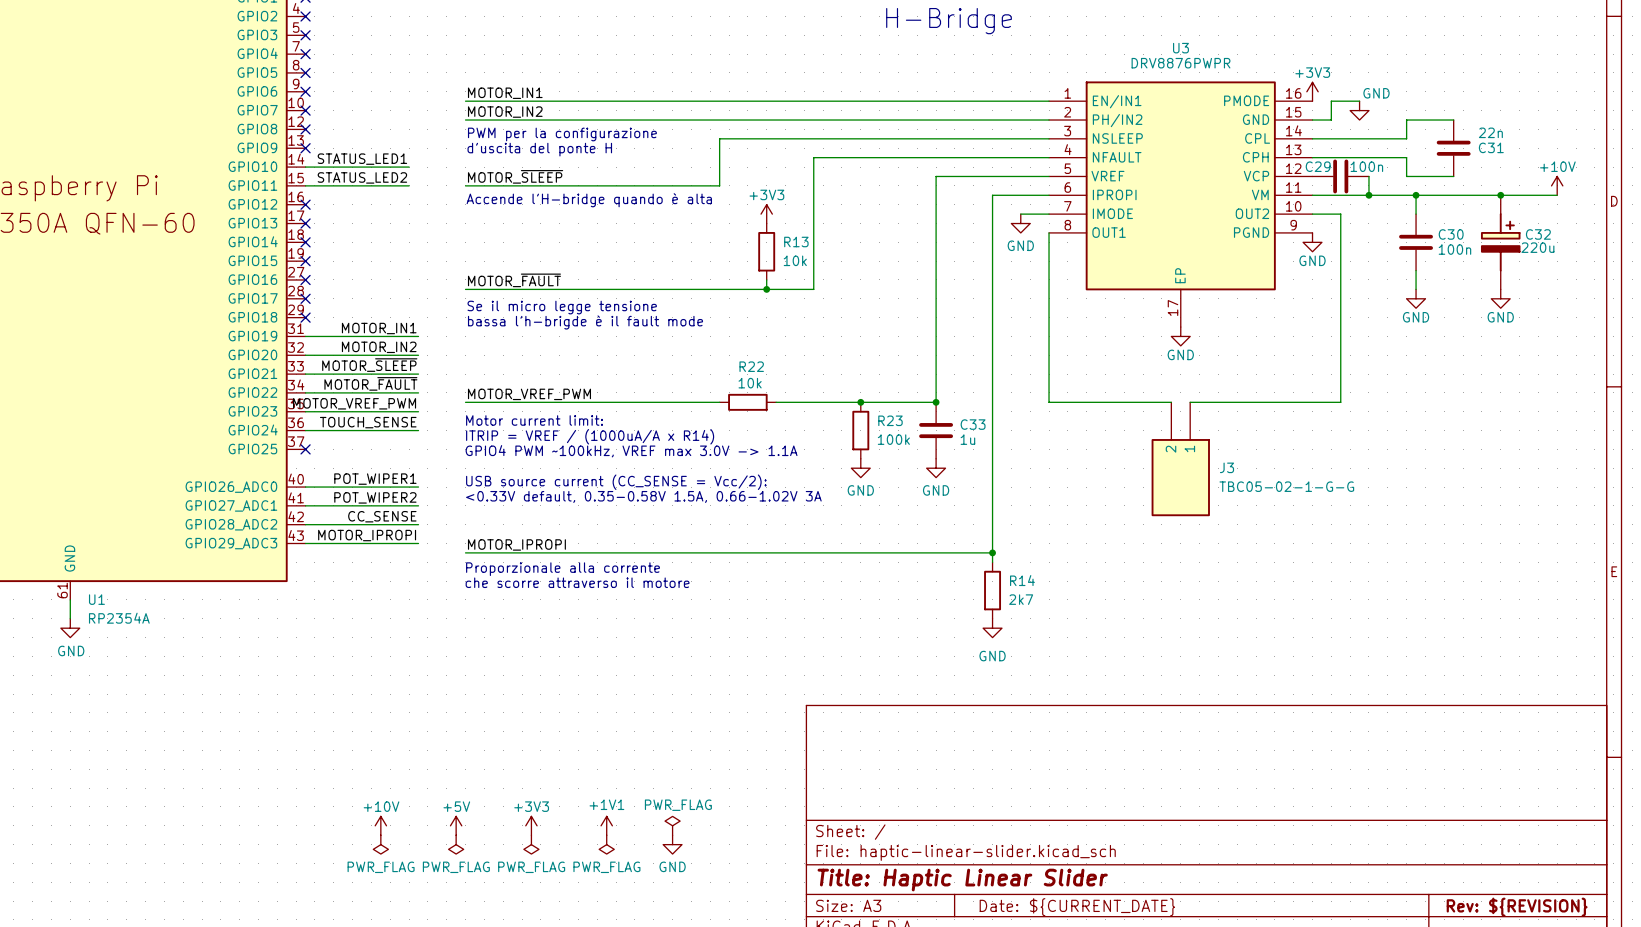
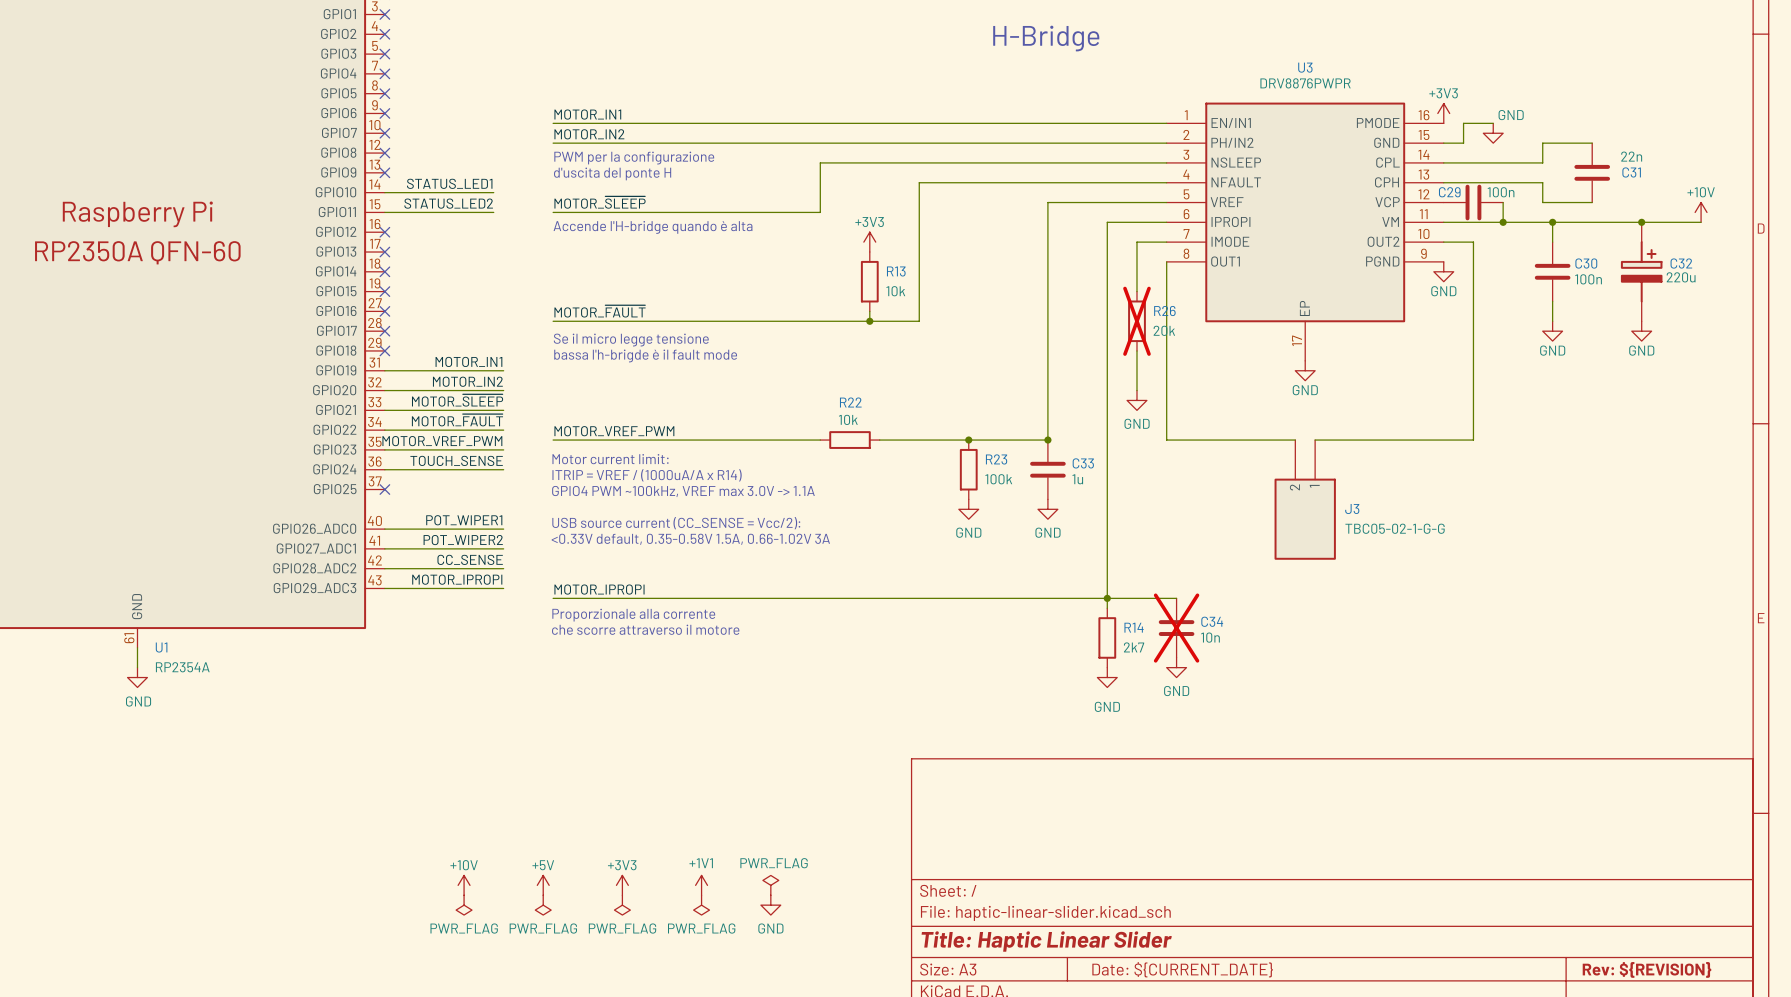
wire: none -> (1136, 242) (1136, 291)
power symbol position: GND (1020, 223) -> GND (1136, 400)
R26: none -> 20k (1136, 321)
wire: none -> (1136, 350) (1136, 390)
wire: none -> (1107, 598) (1176, 598)
C34: none -> 10n (1176, 628)
power symbol: none -> GND (1176, 667)

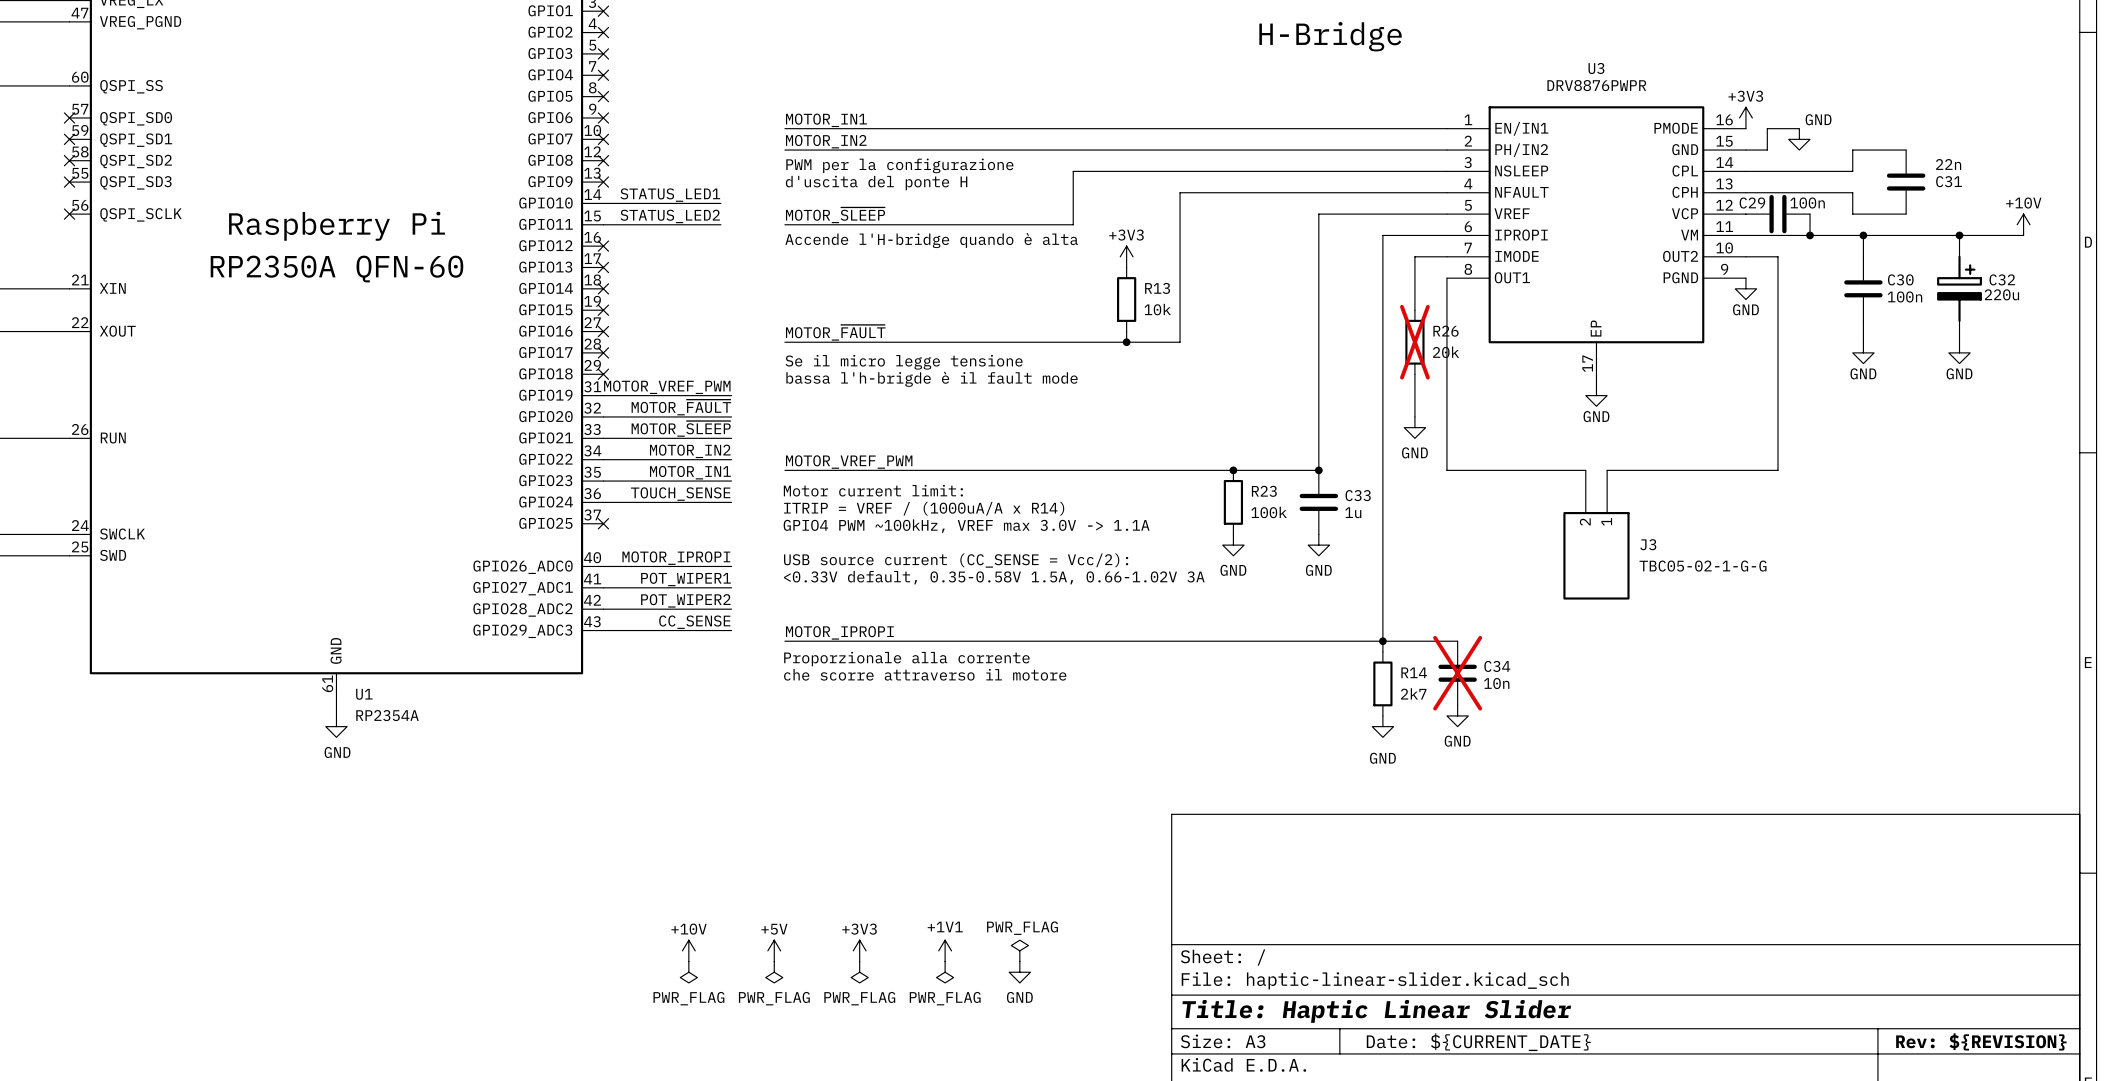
label: MOTOR_IN1 (468, 361) -> MOTOR_VREF_PWM (667, 387)
label: MOTOR_IN2 (467, 381) -> MOTOR_~{FAULT} (681, 407)
label: MOTOR_~{FAULT} (457, 420) -> MOTOR_IN2 (690, 451)
wire: none -> (1073, 470) (1137, 470)
R22: 10k (850, 440) -> none
label: MOTOR_VREF_PWM (442, 441) -> MOTOR_IN1 (690, 472)
label: POT_WIPER1 (464, 520) -> MOTOR_IPROPI (676, 558)
label: POT_WIPER2 (463, 540) -> POT_WIPER1 (685, 579)
label: CC_SENSE (470, 559) -> POT_WIPER2 (685, 600)
label: MOTOR_IPROPI (457, 579) -> CC_SENSE (694, 622)

